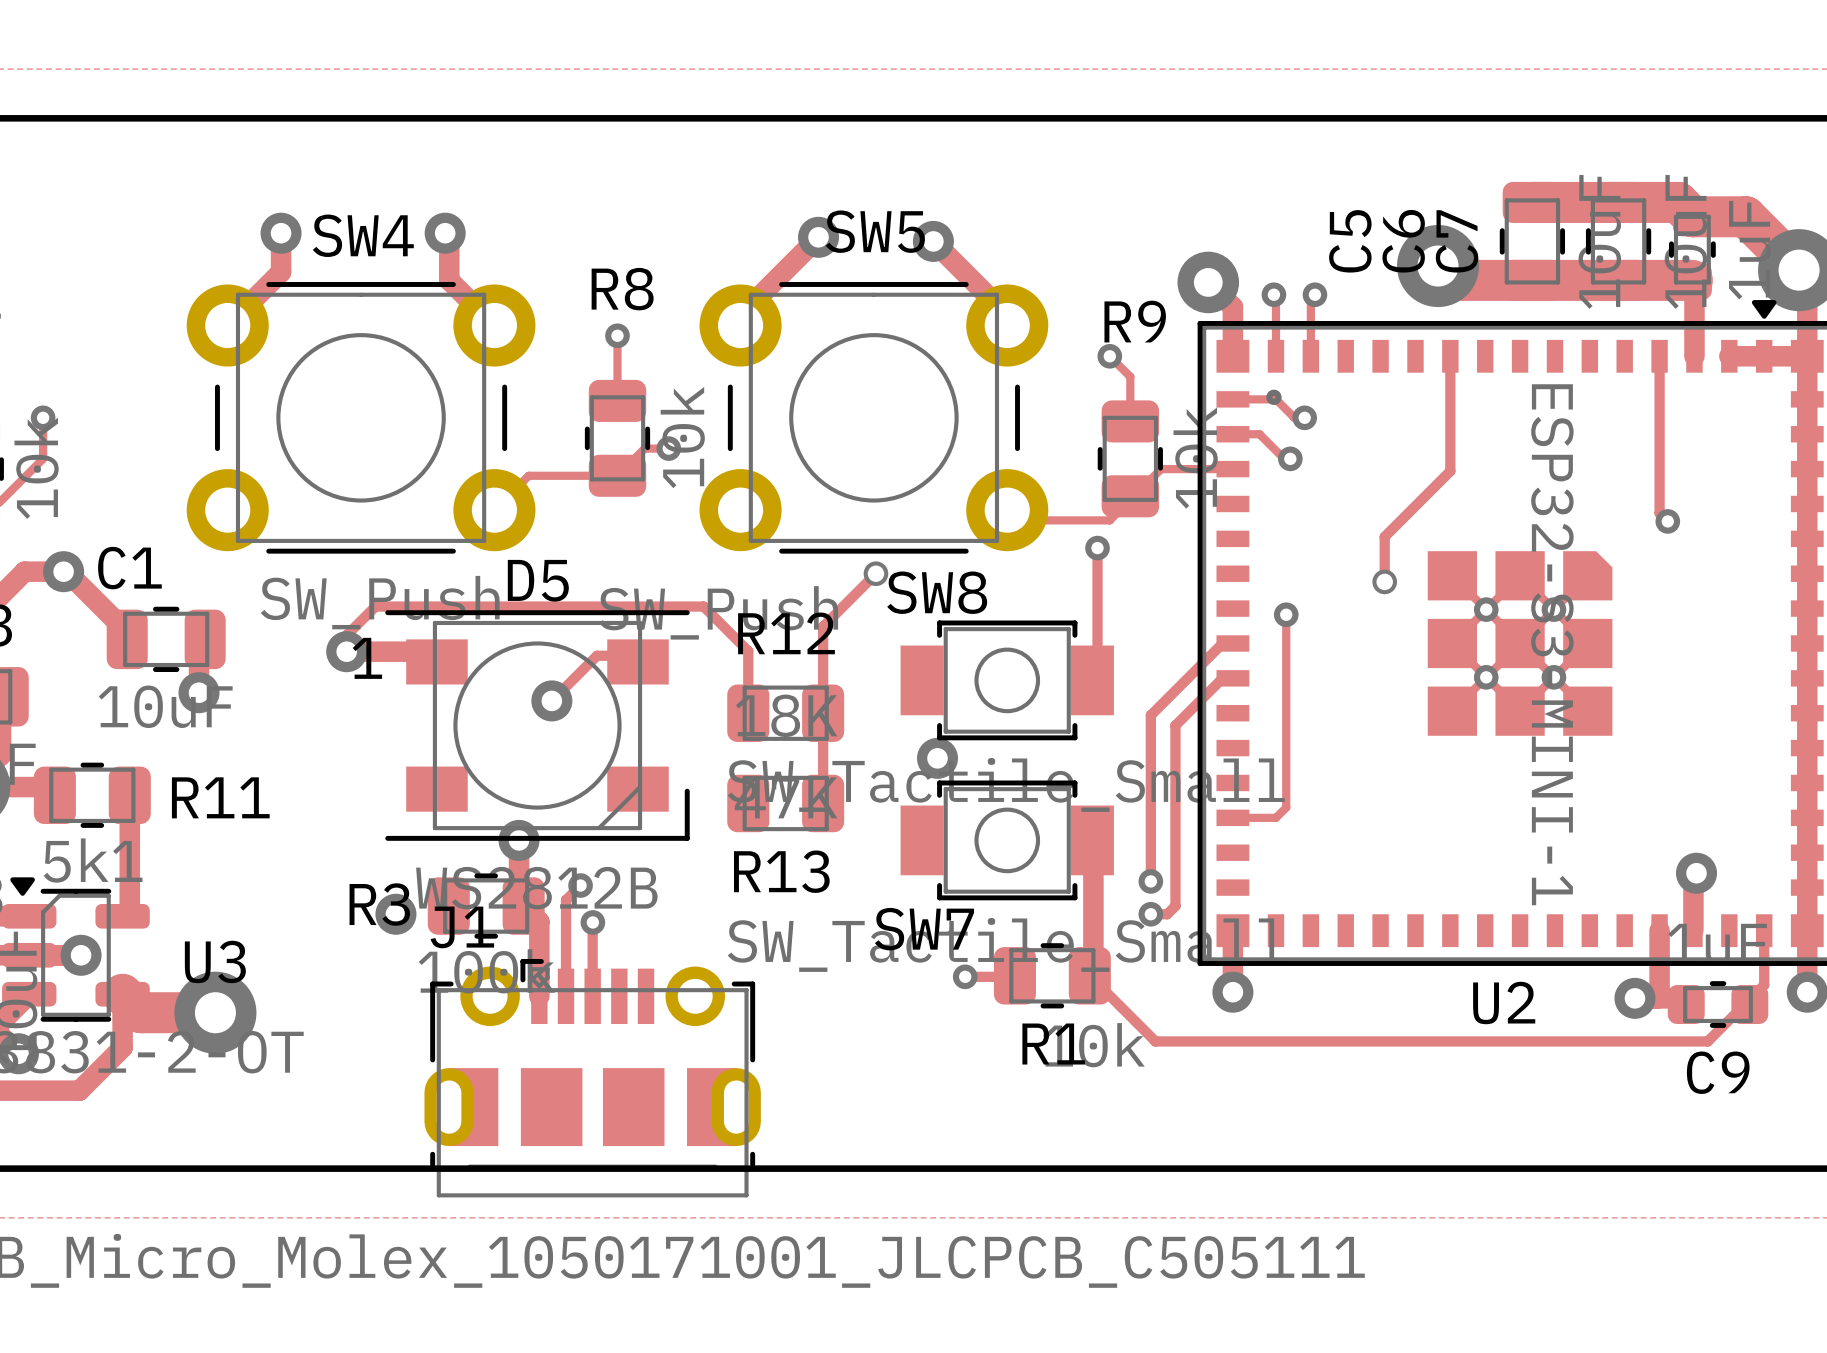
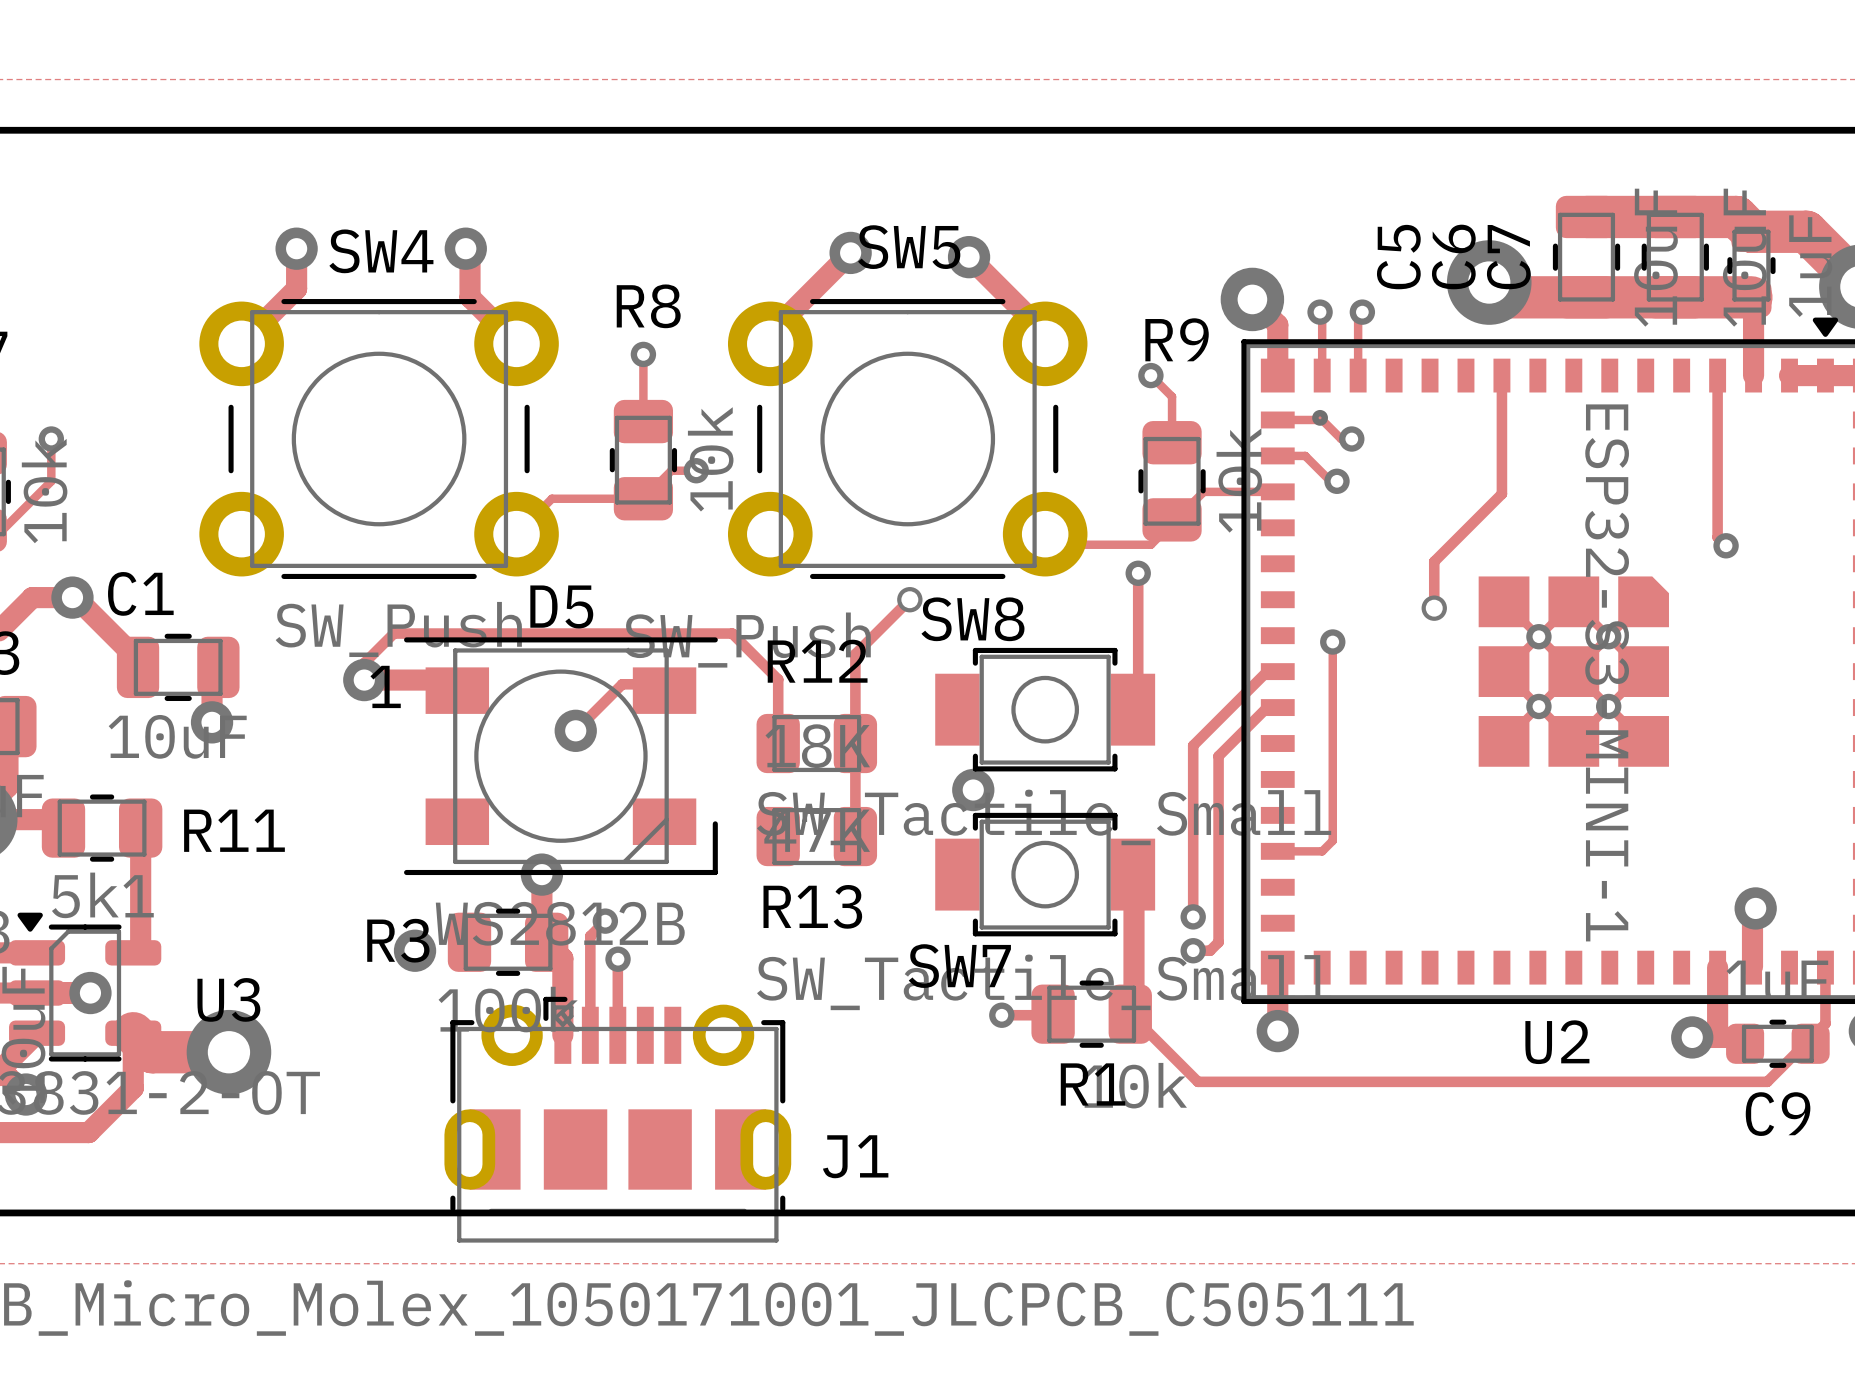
J1 name position: J1 (462, 927) -> J1 (855, 1156)

